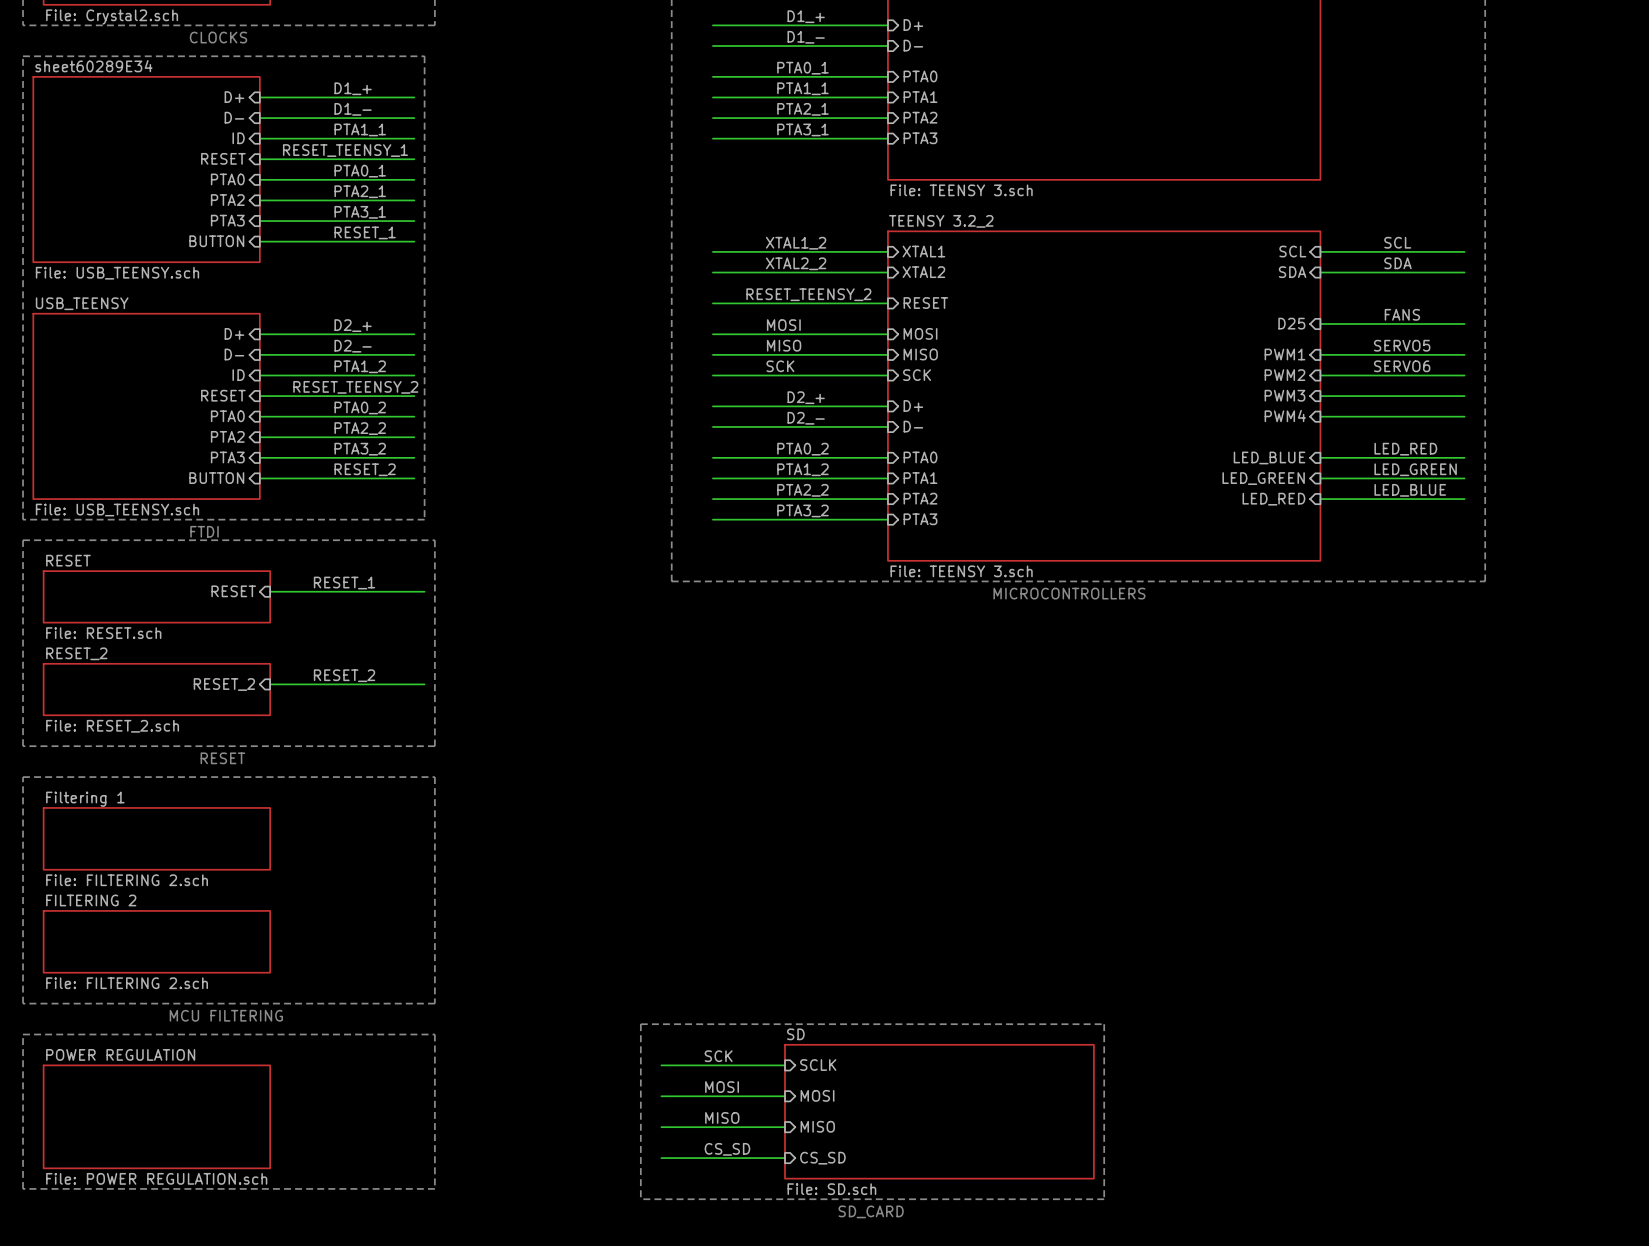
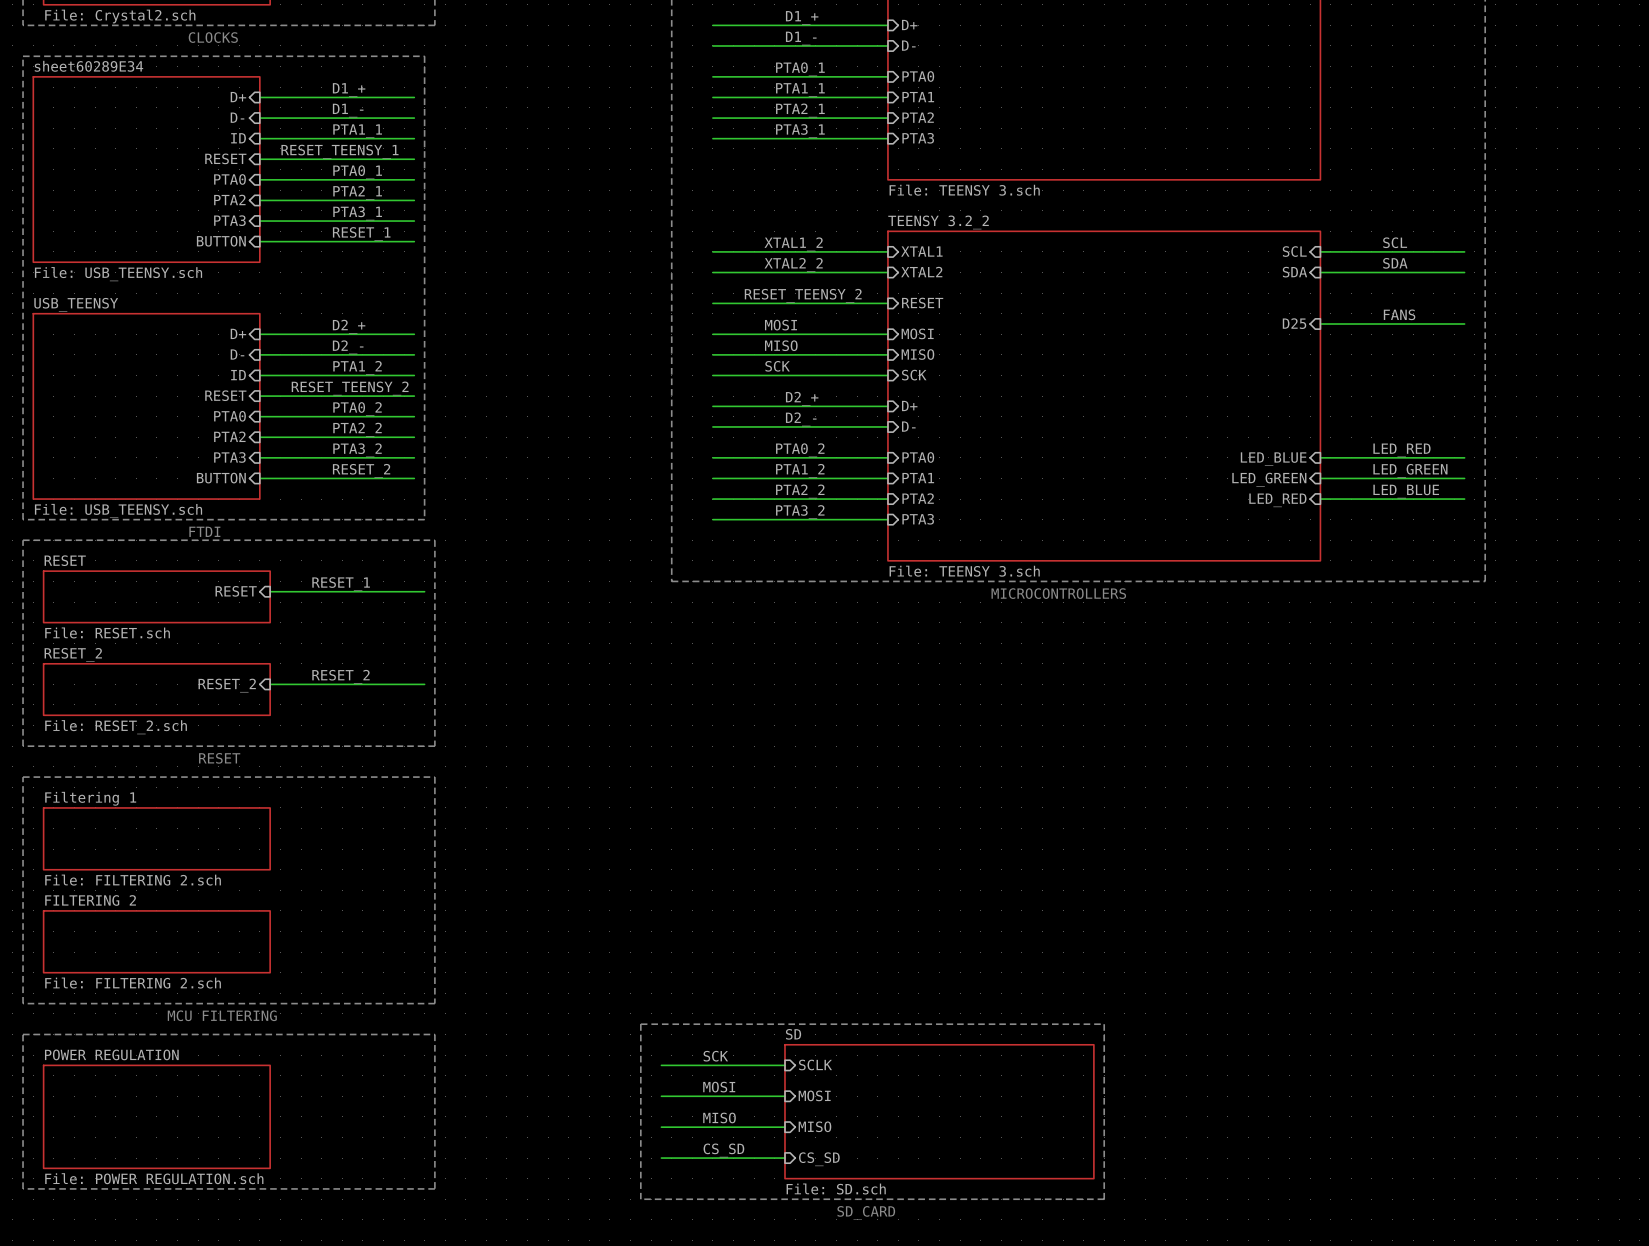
label: SERVO5 (1402, 345) -> none
sheet pin: PWM1 (1284, 354) -> none
wire: (1320, 354) (1464, 354) -> none
label: SERVO6 (1402, 366) -> none
sheet pin: PWM2 (1284, 375) -> none
wire: (1320, 375) (1464, 375) -> none
sheet pin: PWM3 (1284, 395) -> none
wire: (1320, 396) (1464, 396) -> none
sheet pin: PWM4 (1285, 416) -> none
wire: (1320, 416) (1464, 416) -> none

